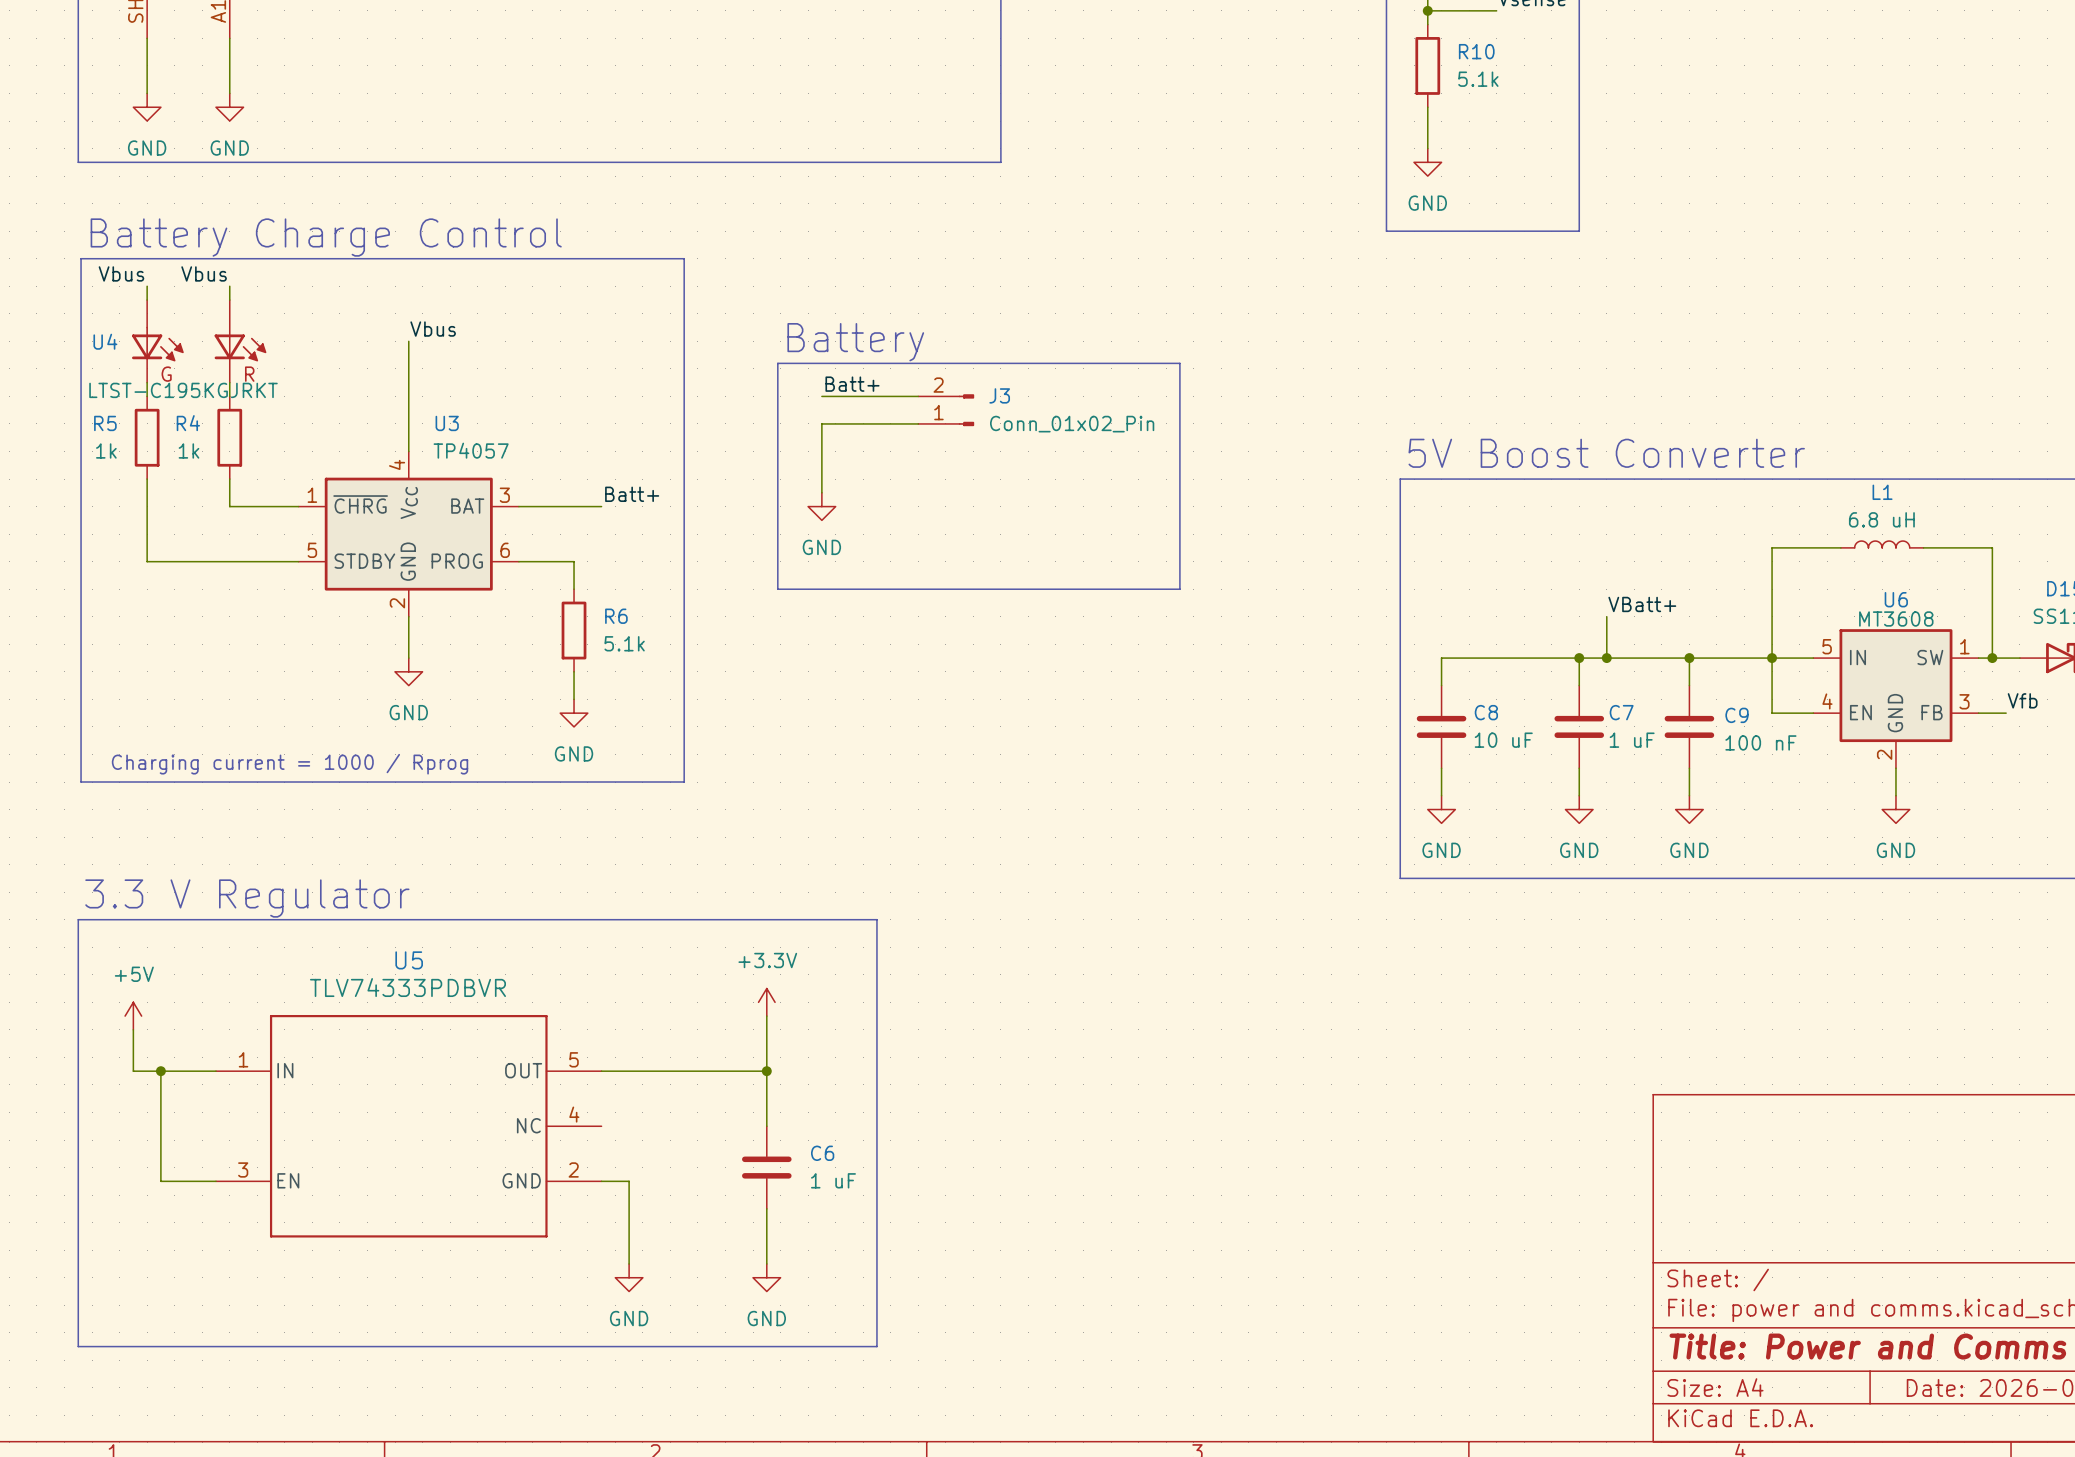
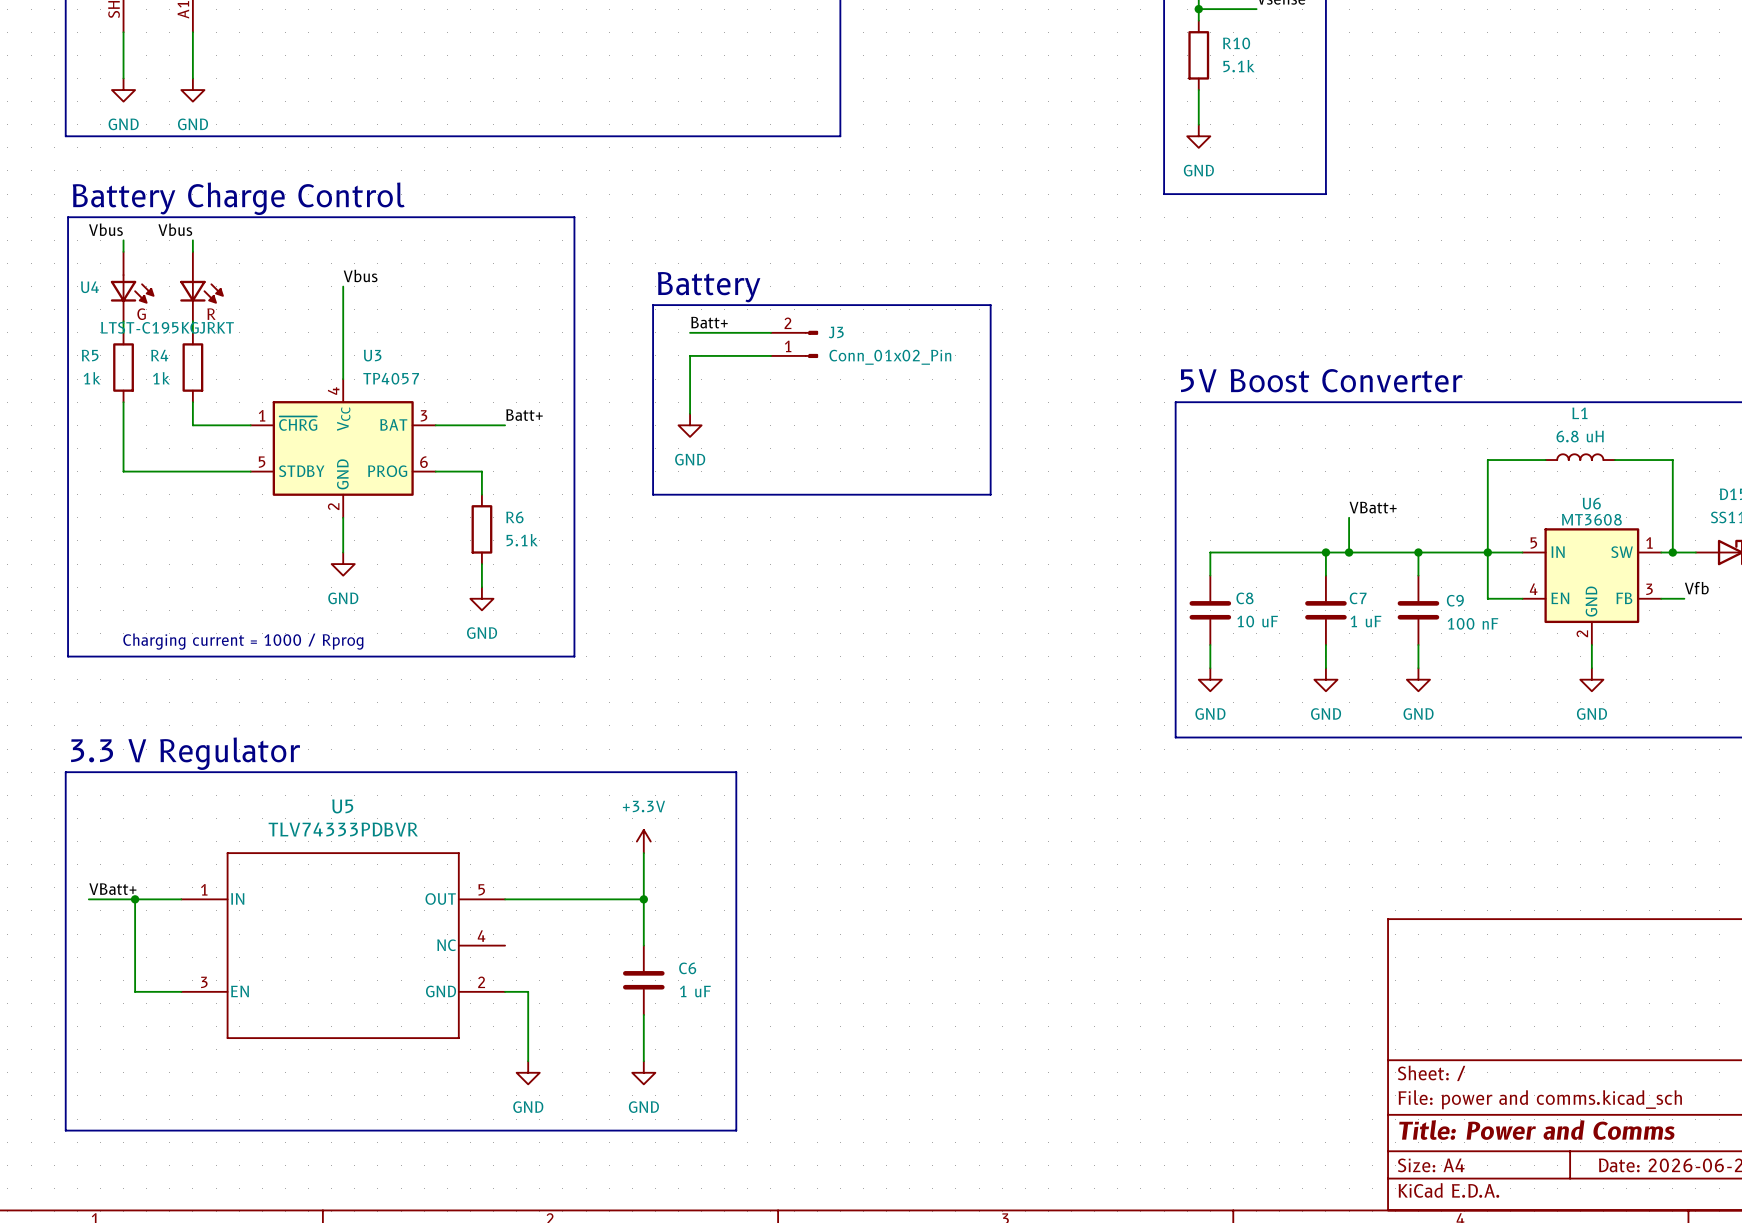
power symbol: +5V (133, 1016) -> none
wire: (133, 1029) (133, 1071) -> (88, 899) (111, 899)
label: none -> VBatt+ (112, 889)

